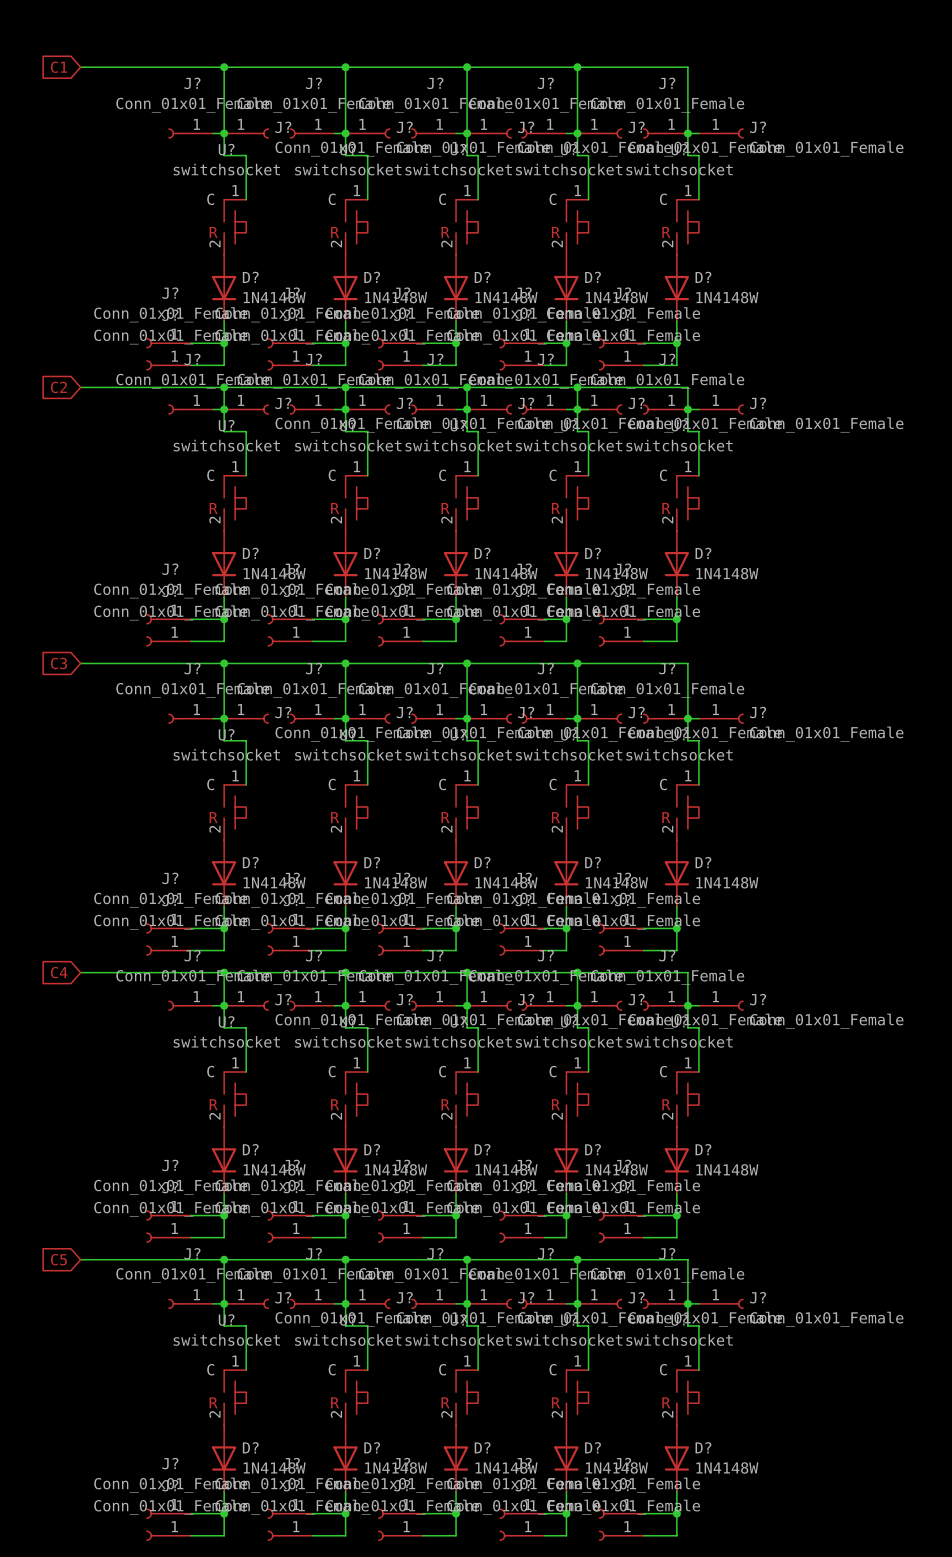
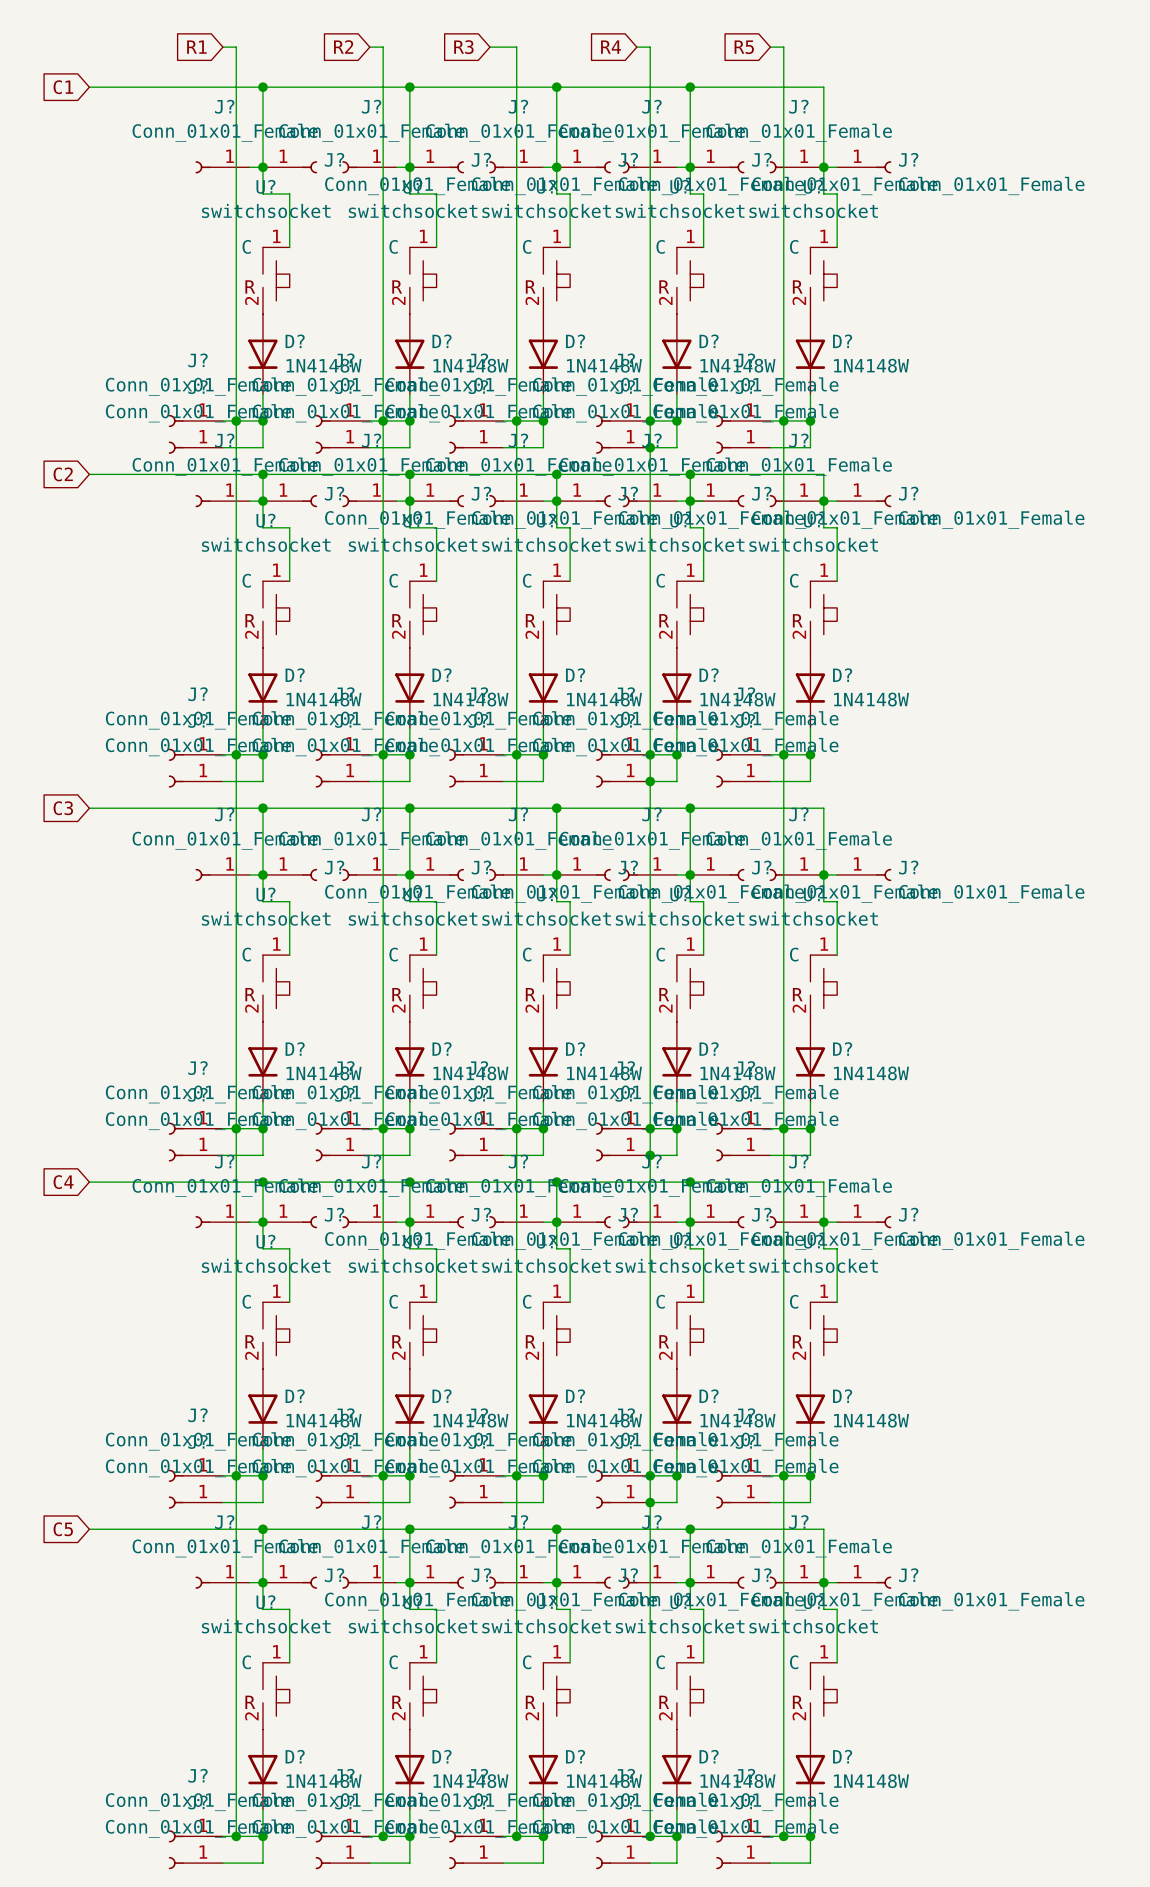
global label: none -> R2 (343, 46)
global label: none -> R1 (196, 47)
wire: none -> (222, 47) (236, 47) (236, 1836)
wire: none -> (369, 47) (383, 47) (383, 1836)
global label: none -> R3 (463, 47)
wire: none -> (489, 47) (516, 47) (516, 1836)
global label: none -> R4 (611, 47)
wire: none -> (636, 47) (650, 47) (650, 1836)
global label: none -> R5 (744, 47)
wire: none -> (770, 47) (783, 47) (783, 1836)
junction: none -> (236, 420)
junction: none -> (383, 420)
junction: none -> (516, 420)
junction: none -> (650, 420)
junction: none -> (783, 420)
junction: none -> (650, 447)
junction: none -> (236, 754)
junction: none -> (383, 754)
junction: none -> (516, 754)
junction: none -> (650, 754)
junction: none -> (783, 754)
junction: none -> (650, 781)
junction: none -> (236, 1128)
junction: none -> (383, 1128)
junction: none -> (516, 1128)
junction: none -> (650, 1128)
junction: none -> (783, 1128)
junction: none -> (650, 1155)
junction: none -> (236, 1475)
junction: none -> (383, 1475)
junction: none -> (516, 1475)
junction: none -> (650, 1475)
junction: none -> (783, 1475)
junction: none -> (650, 1502)
junction: none -> (236, 1836)
junction: none -> (383, 1836)
junction: none -> (516, 1836)
junction: none -> (650, 1836)
junction: none -> (783, 1836)

